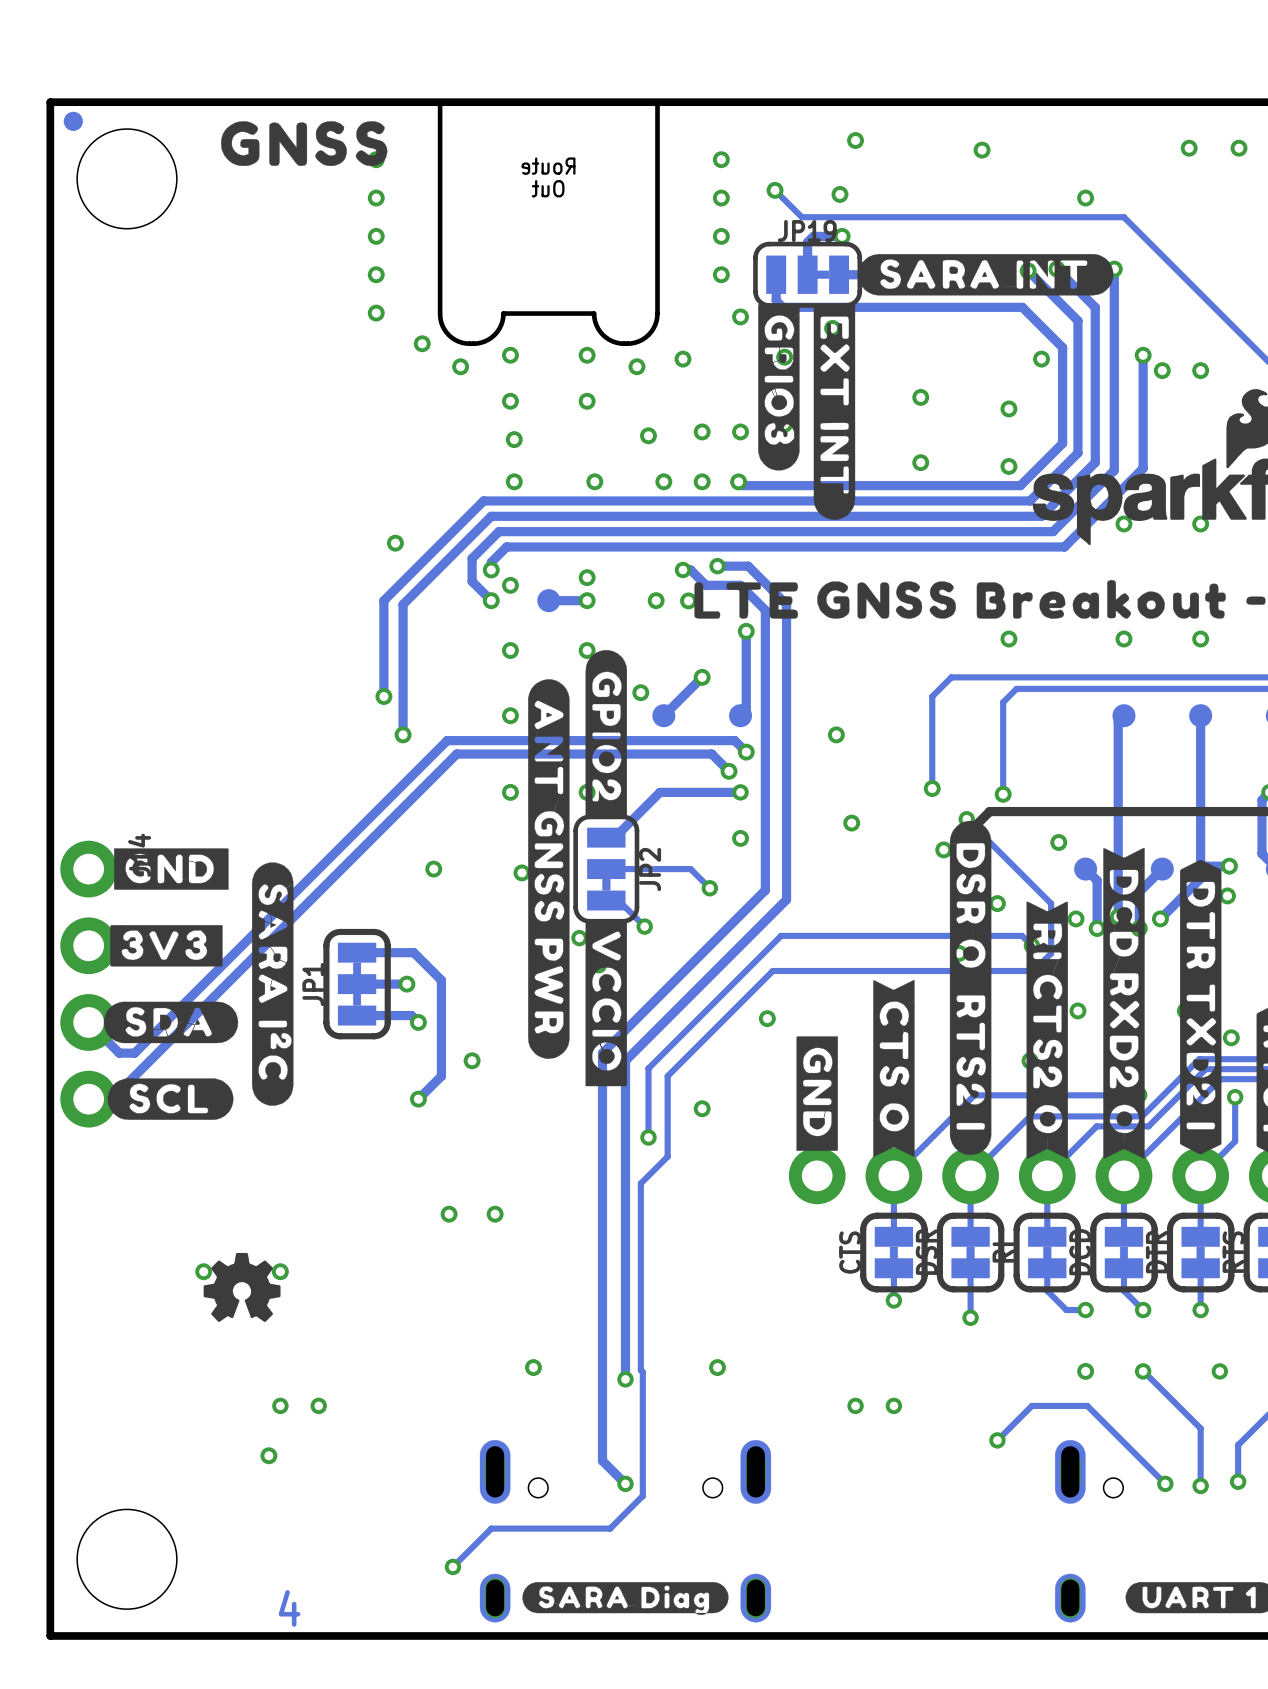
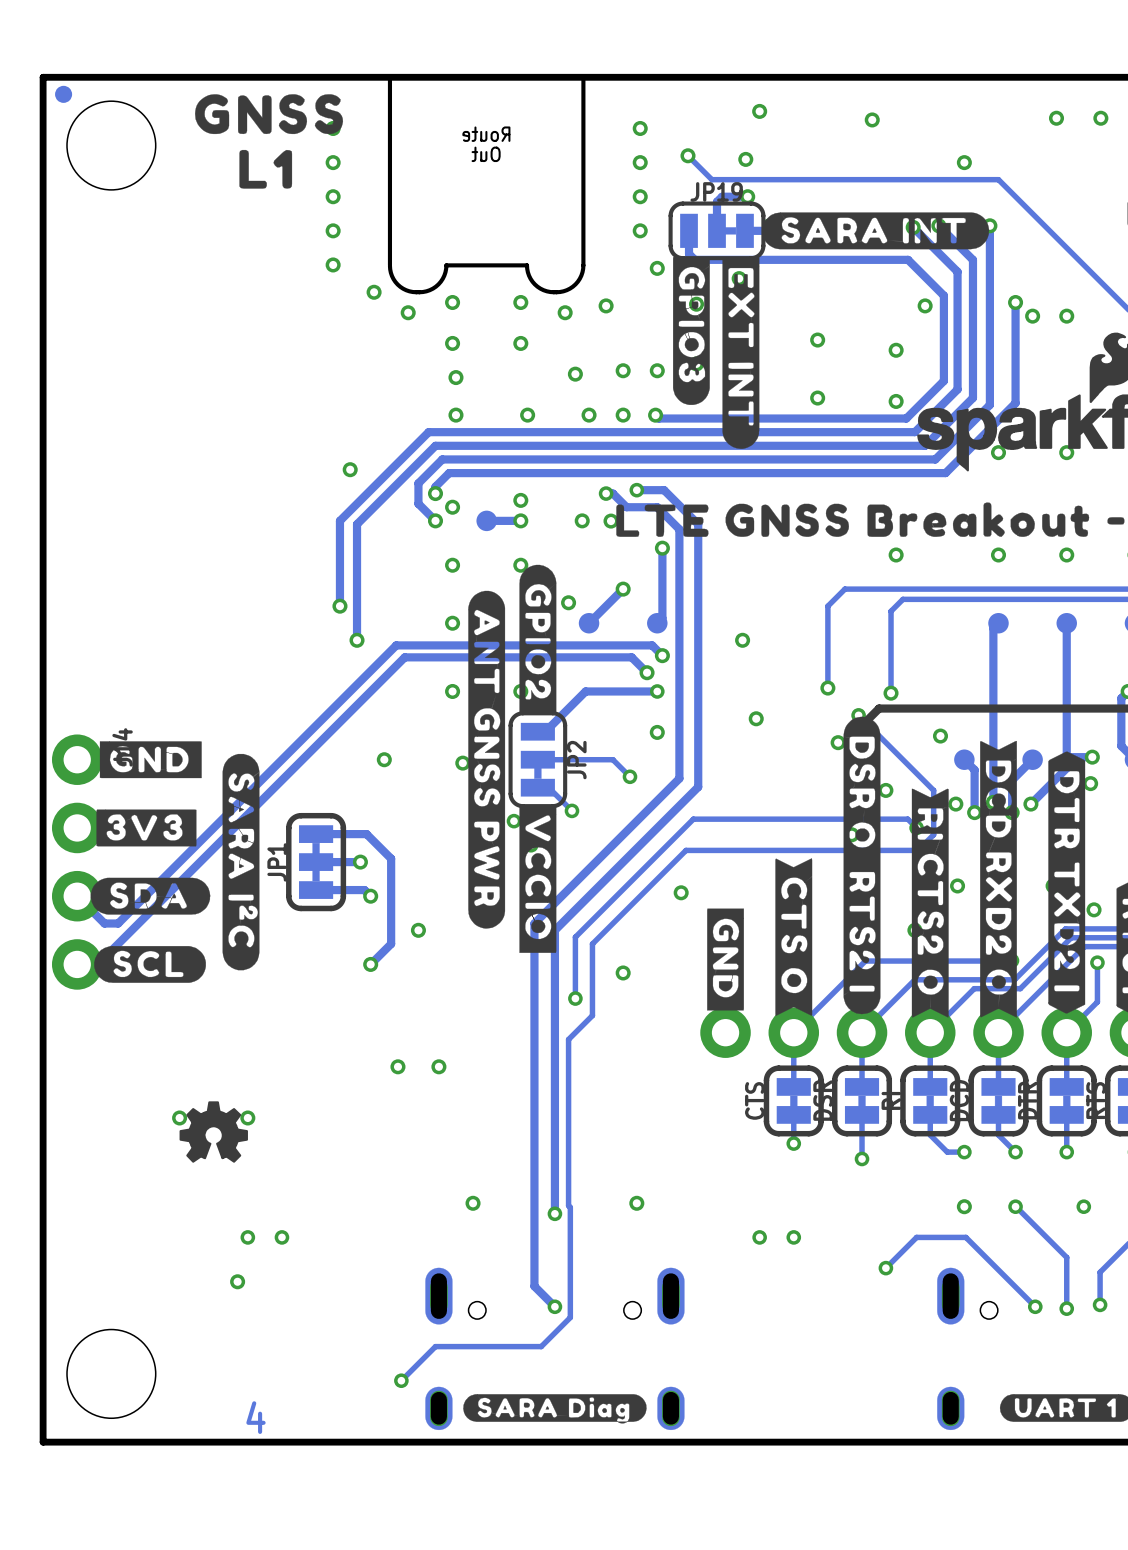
drawing: none -> [239, 149, 293, 189]

